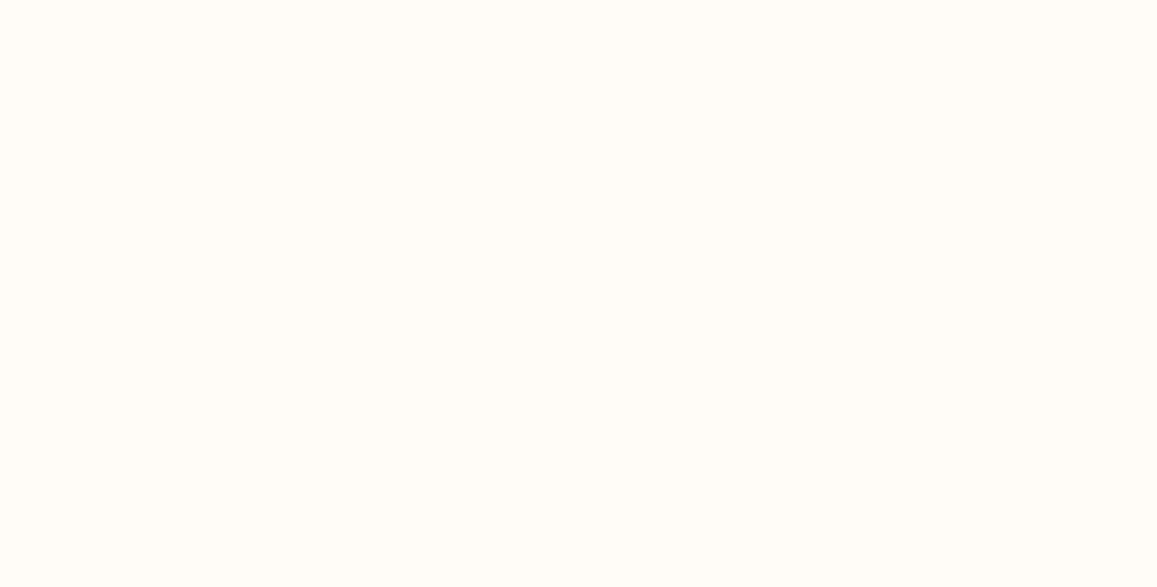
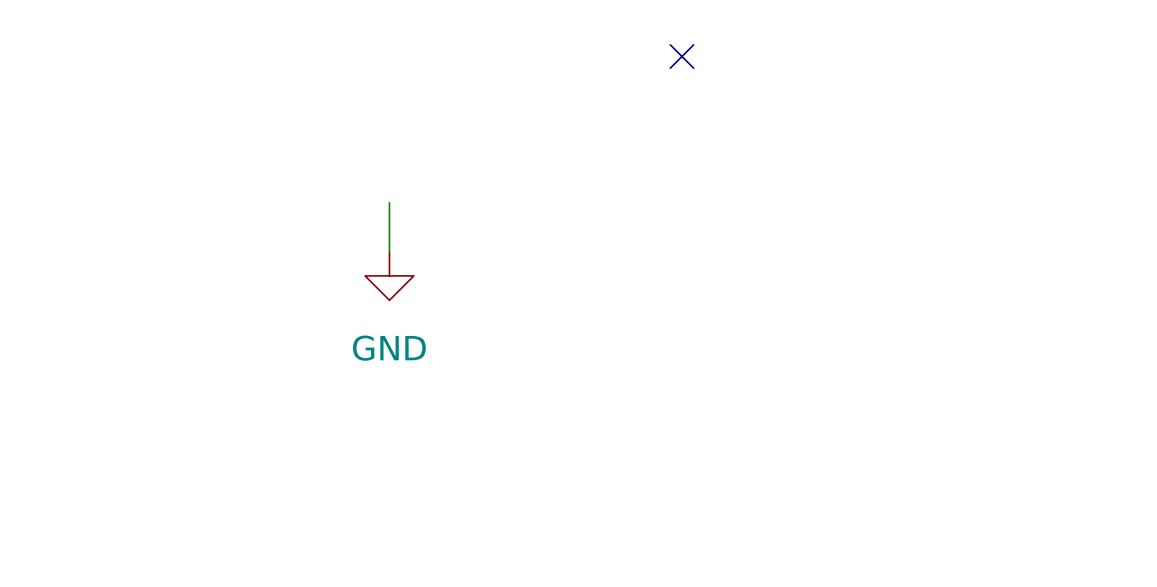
no-connect mark: none -> (681, 56)
wire: none -> (389, 202) (389, 251)
power symbol: none -> GND (389, 275)

